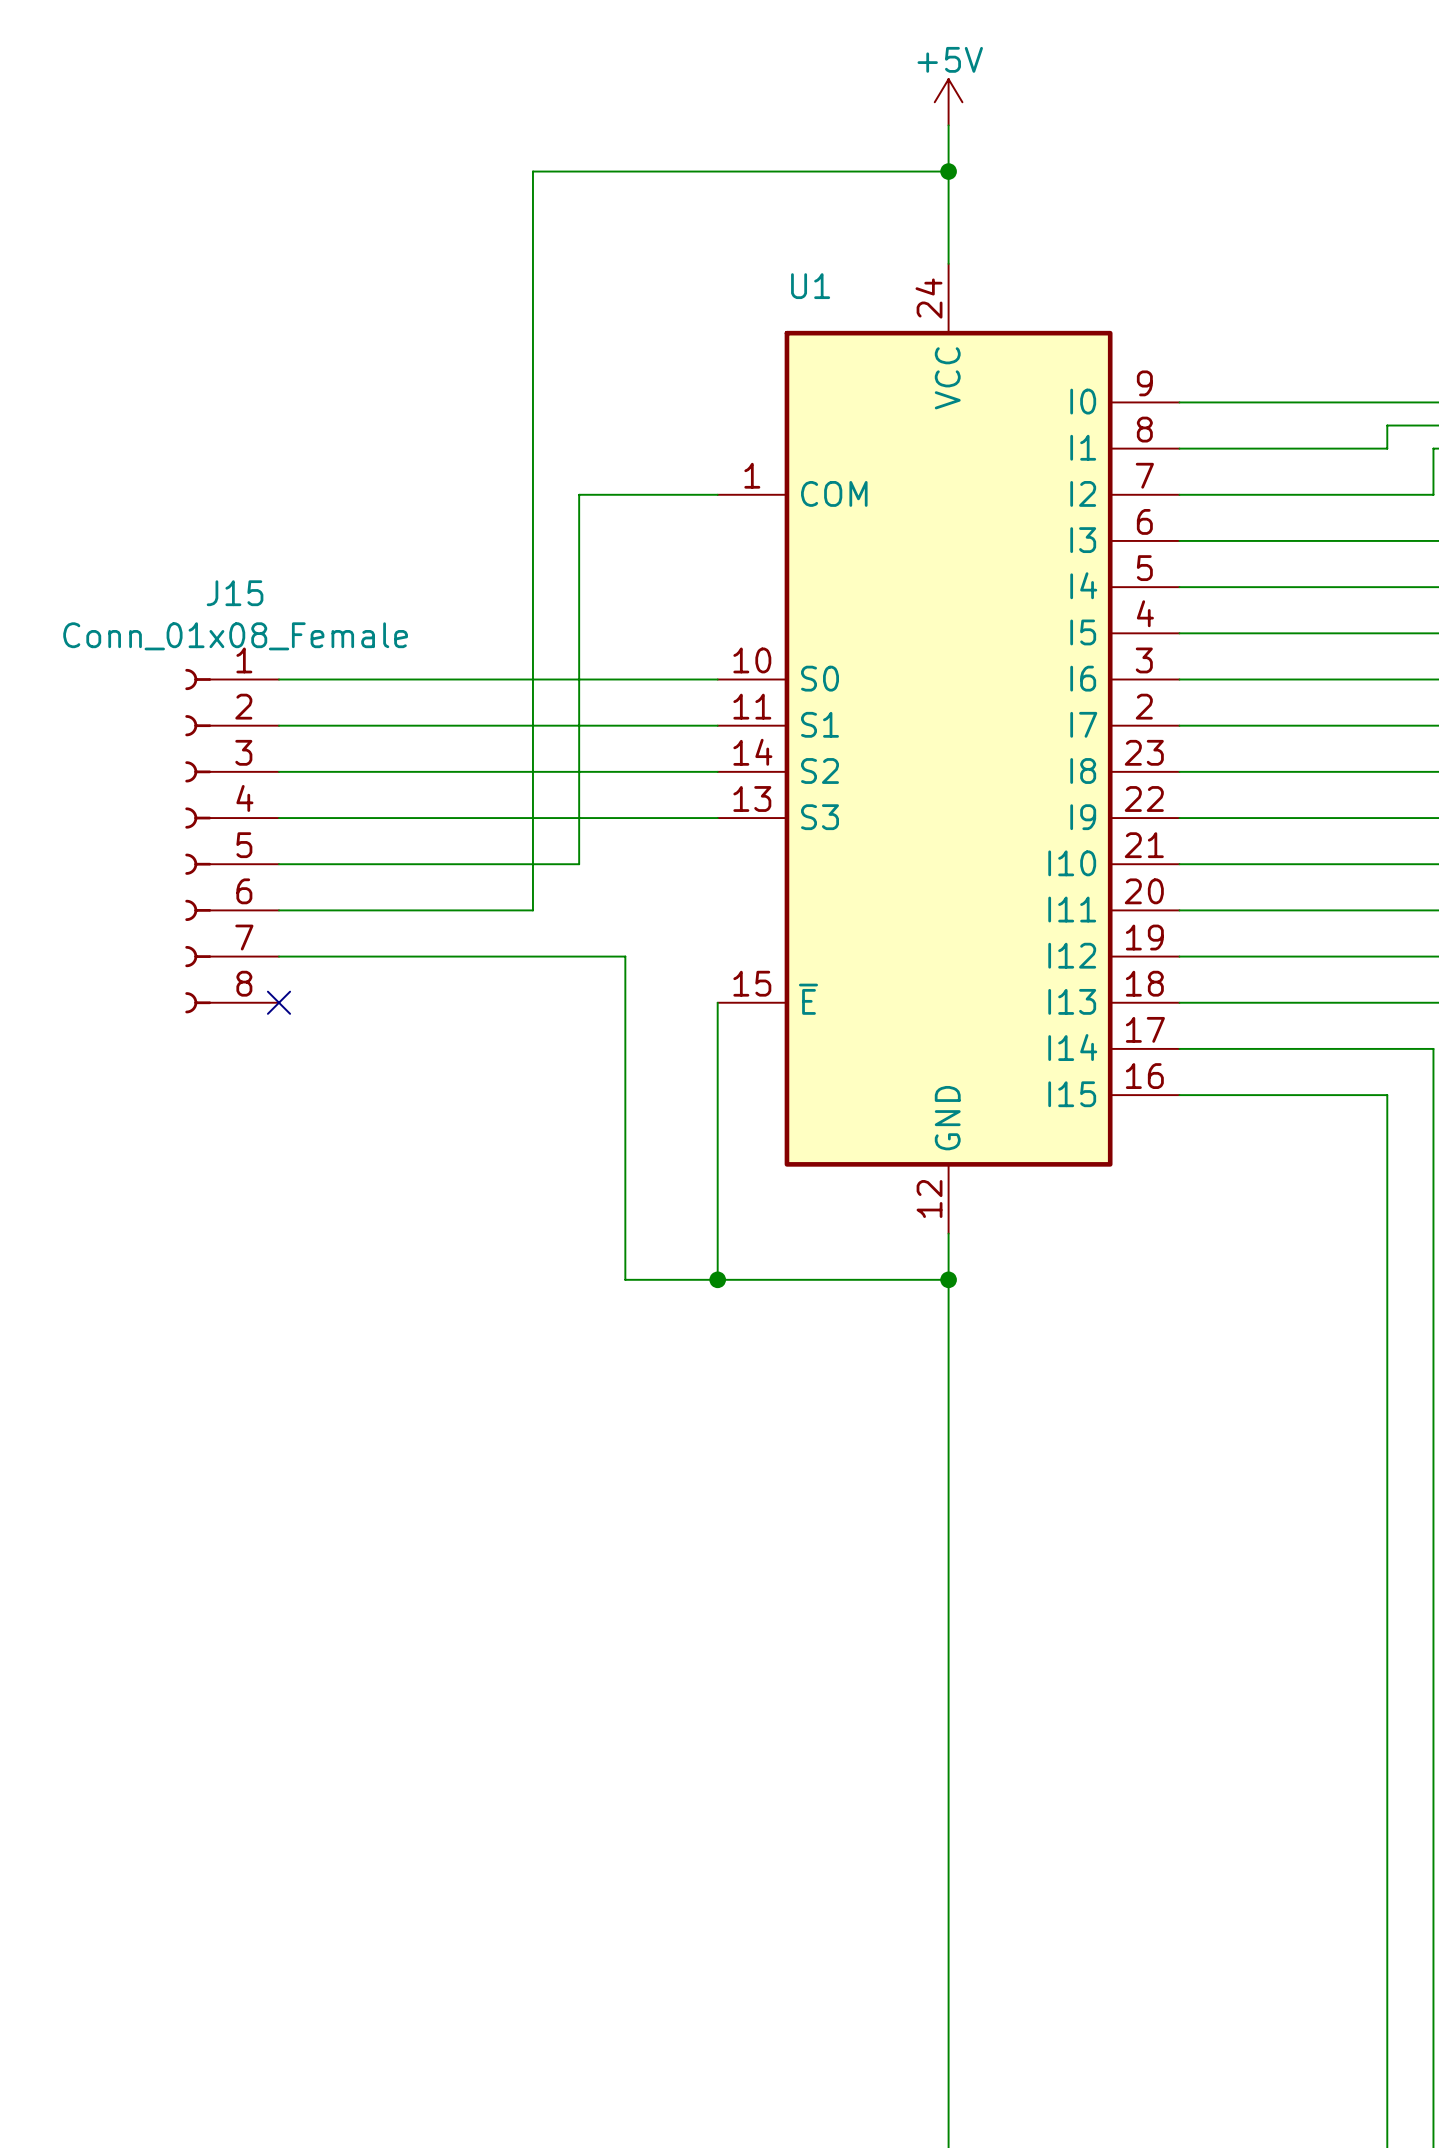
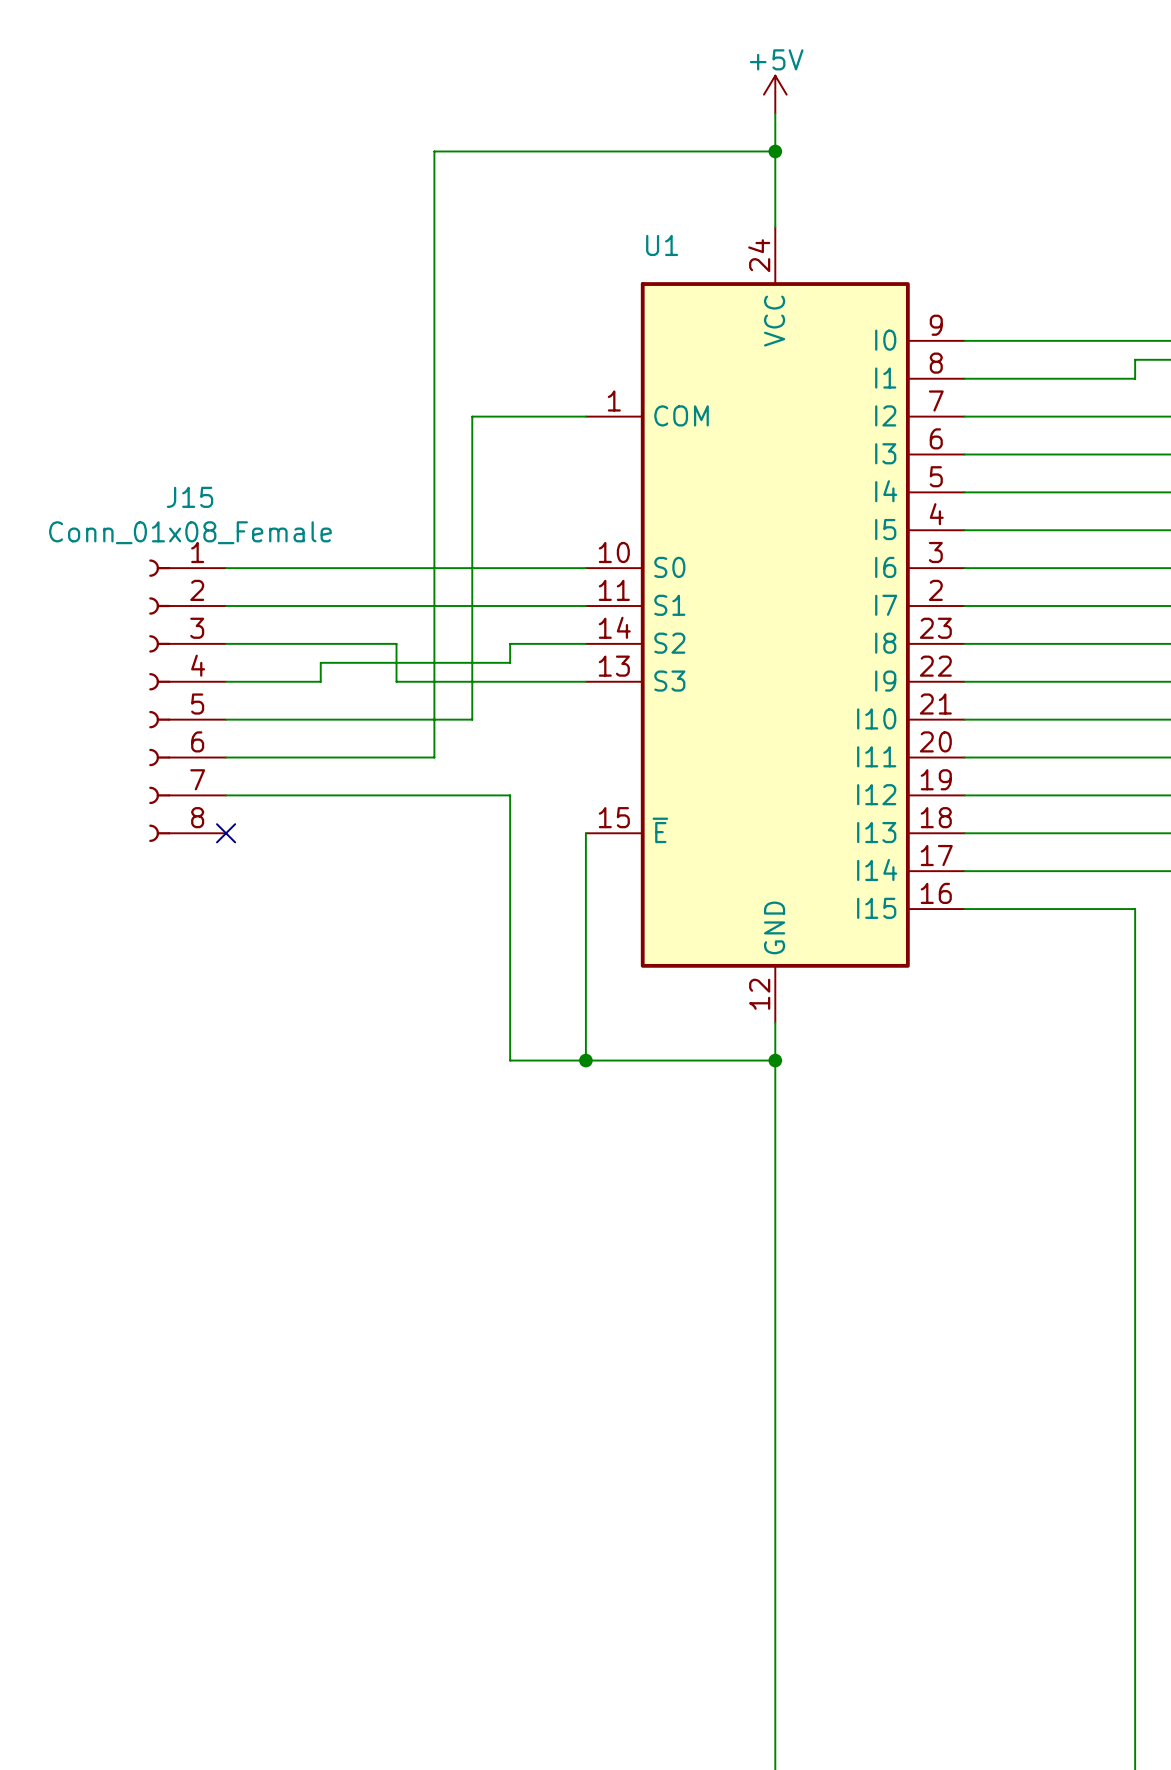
wire: (486, 771) (625, 771) -> (320, 681) (320, 662) (510, 662) (510, 643)
wire: (394, 818) (486, 818) -> (396, 643) (396, 681)

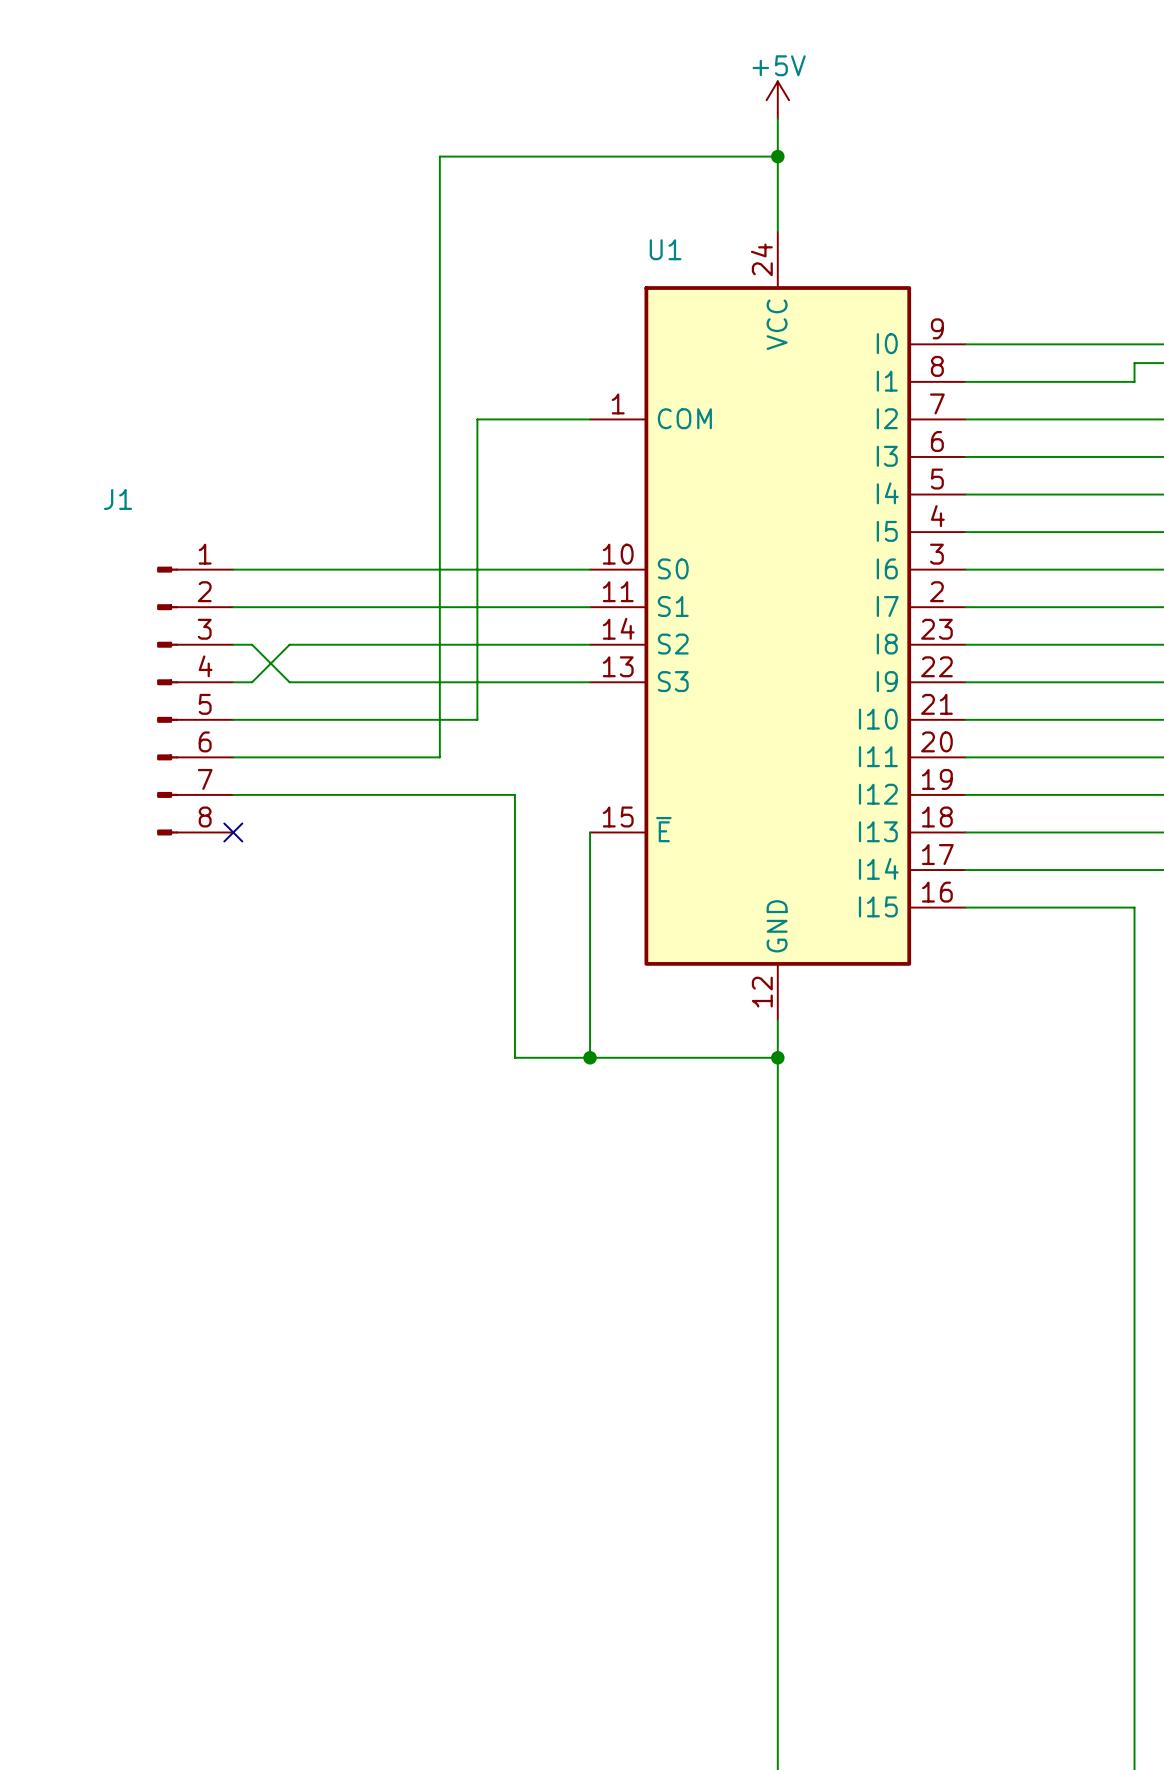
wire: (245, 643) (282, 643) -> (252, 644) (289, 682)
wire: (396, 643) (396, 681) -> (327, 682) (402, 682)
wire: (510, 643) (510, 662) (320, 662) (320, 681) -> (514, 644) (402, 644)
wire: (245, 681) (282, 681) -> (252, 682) (289, 644)
J15: Conn_01x08_Female (187, 700) -> none
J1: none -> (195, 701)

